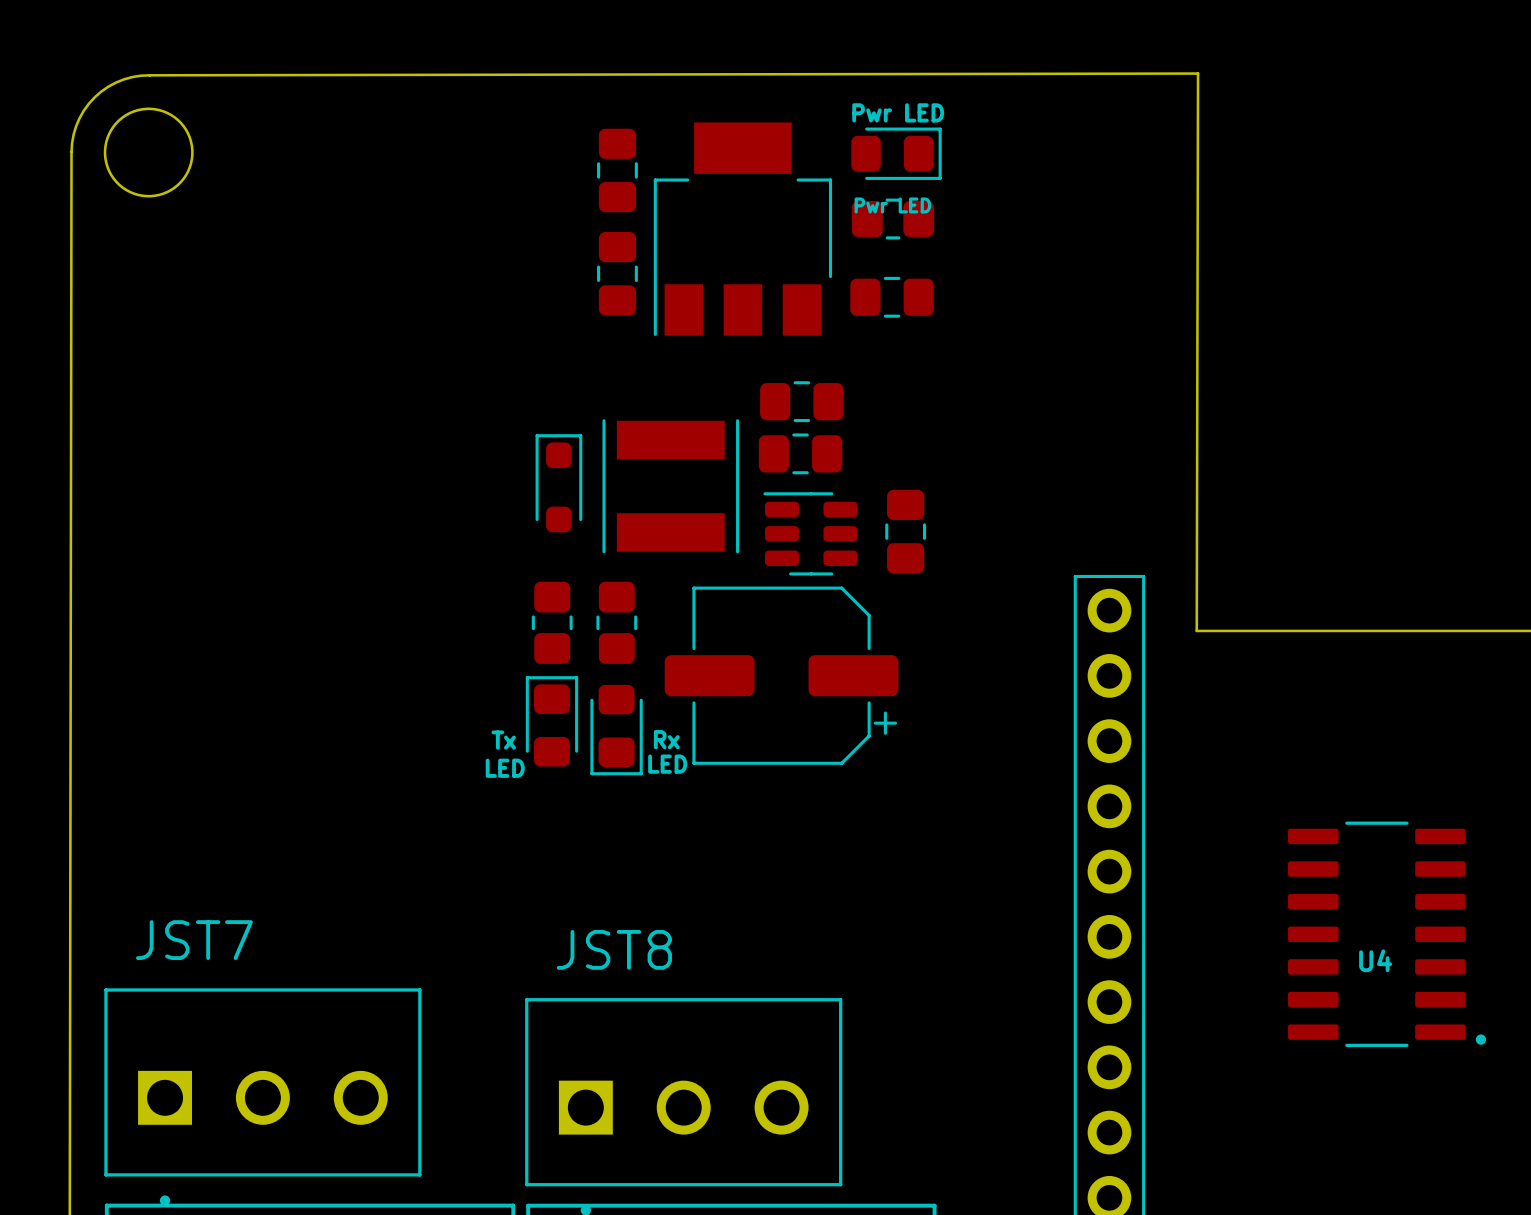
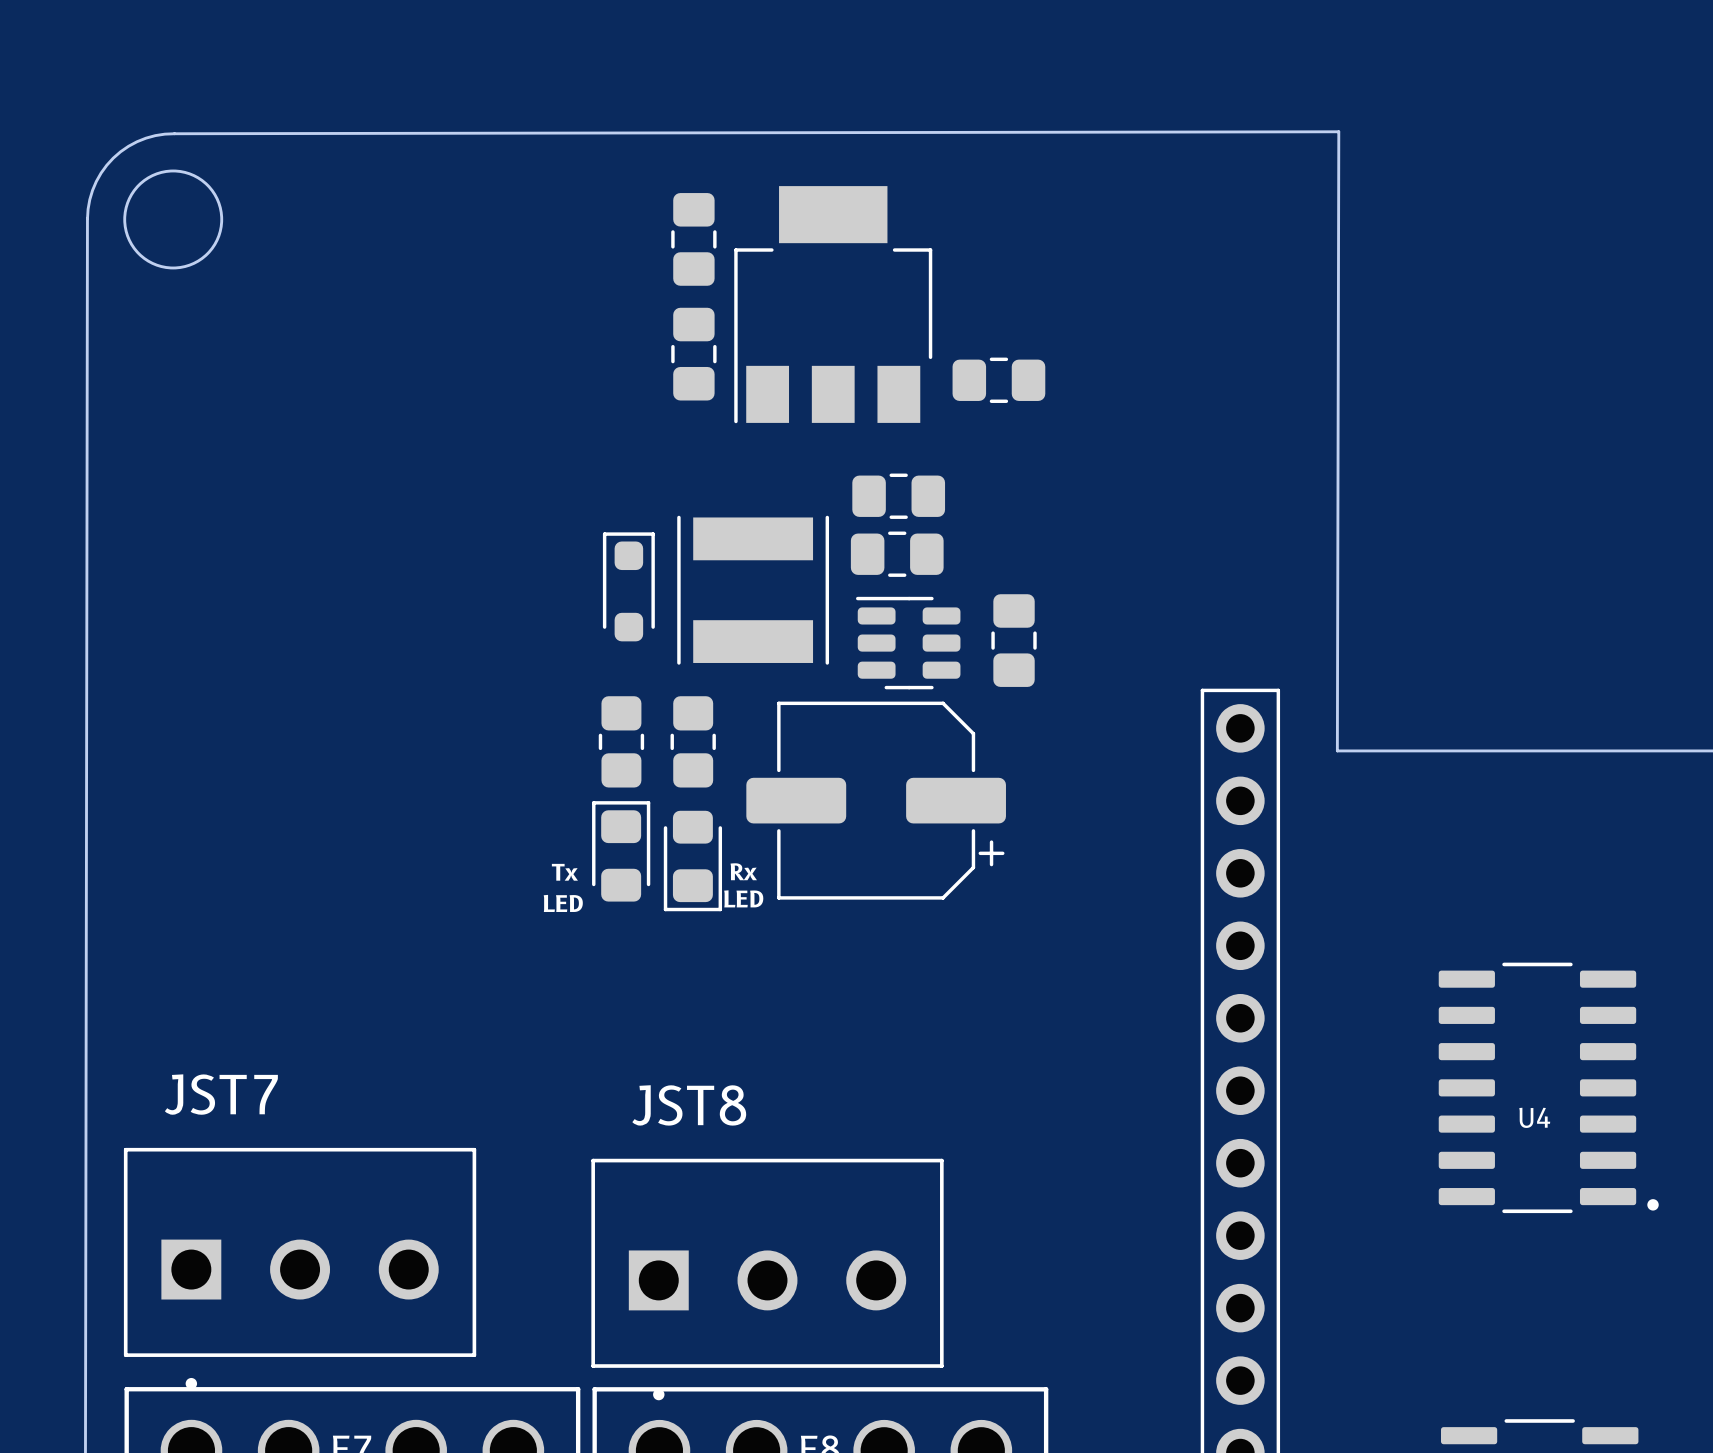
text: Pwr LED (898, 112) -> none
part: Pwr LED (896, 153) -> none
part: (893, 218) -> none

